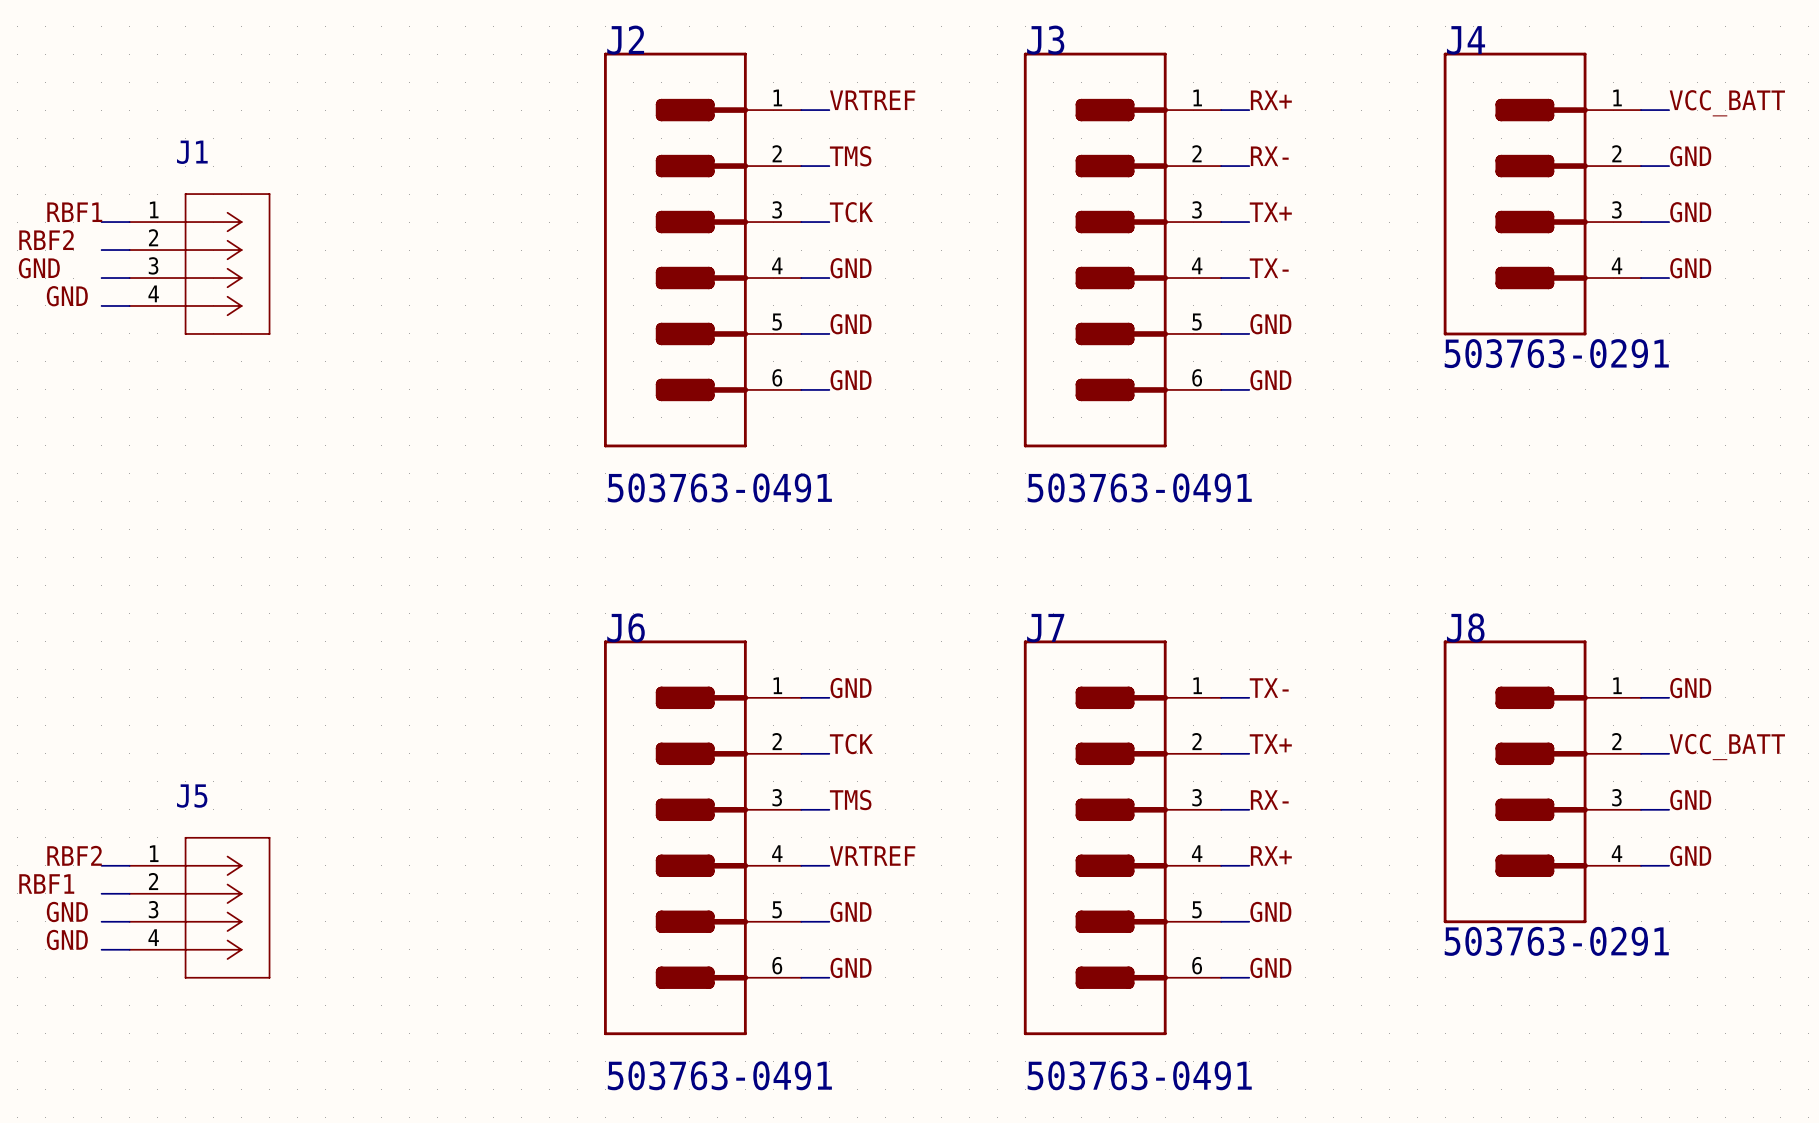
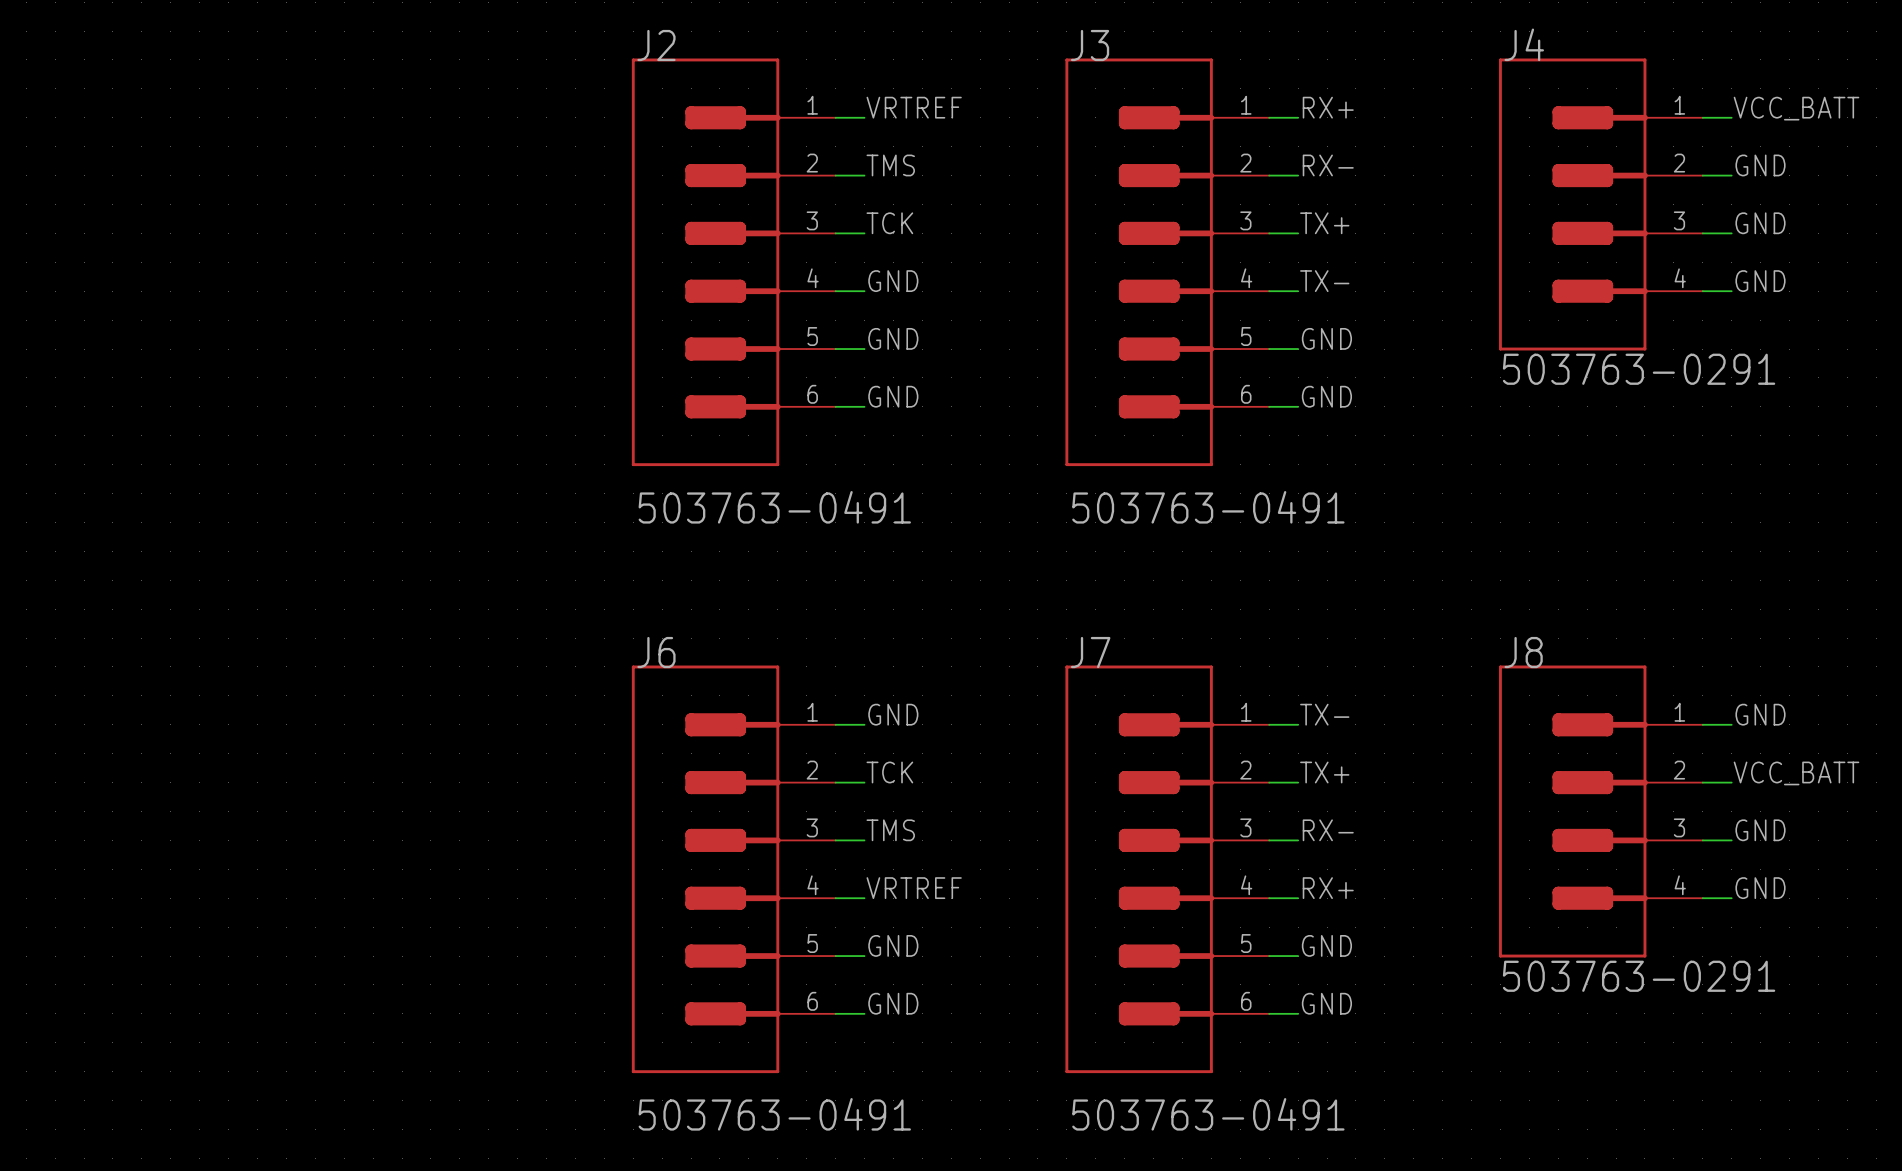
label: RBF1 (74, 212) -> none
wire: (101, 222) (129, 222) -> none
label: RBF2 (46, 240) -> none
wire: (101, 250) (129, 250) -> none
J1: (199, 264) -> none
label: GND (39, 268) -> none
wire: (101, 278) (129, 278) -> none
label: GND (67, 296) -> none
wire: (101, 305) (129, 305) -> none
label: RBF2 (74, 855) -> none
wire: (101, 865) (129, 865) -> none
label: RBF1 (46, 883) -> none
wire: (101, 893) (129, 893) -> none
J5: (199, 907) -> none
label: GND (67, 911) -> none
wire: (101, 921) (129, 921) -> none
label: GND (67, 939) -> none
wire: (101, 949) (129, 949) -> none

